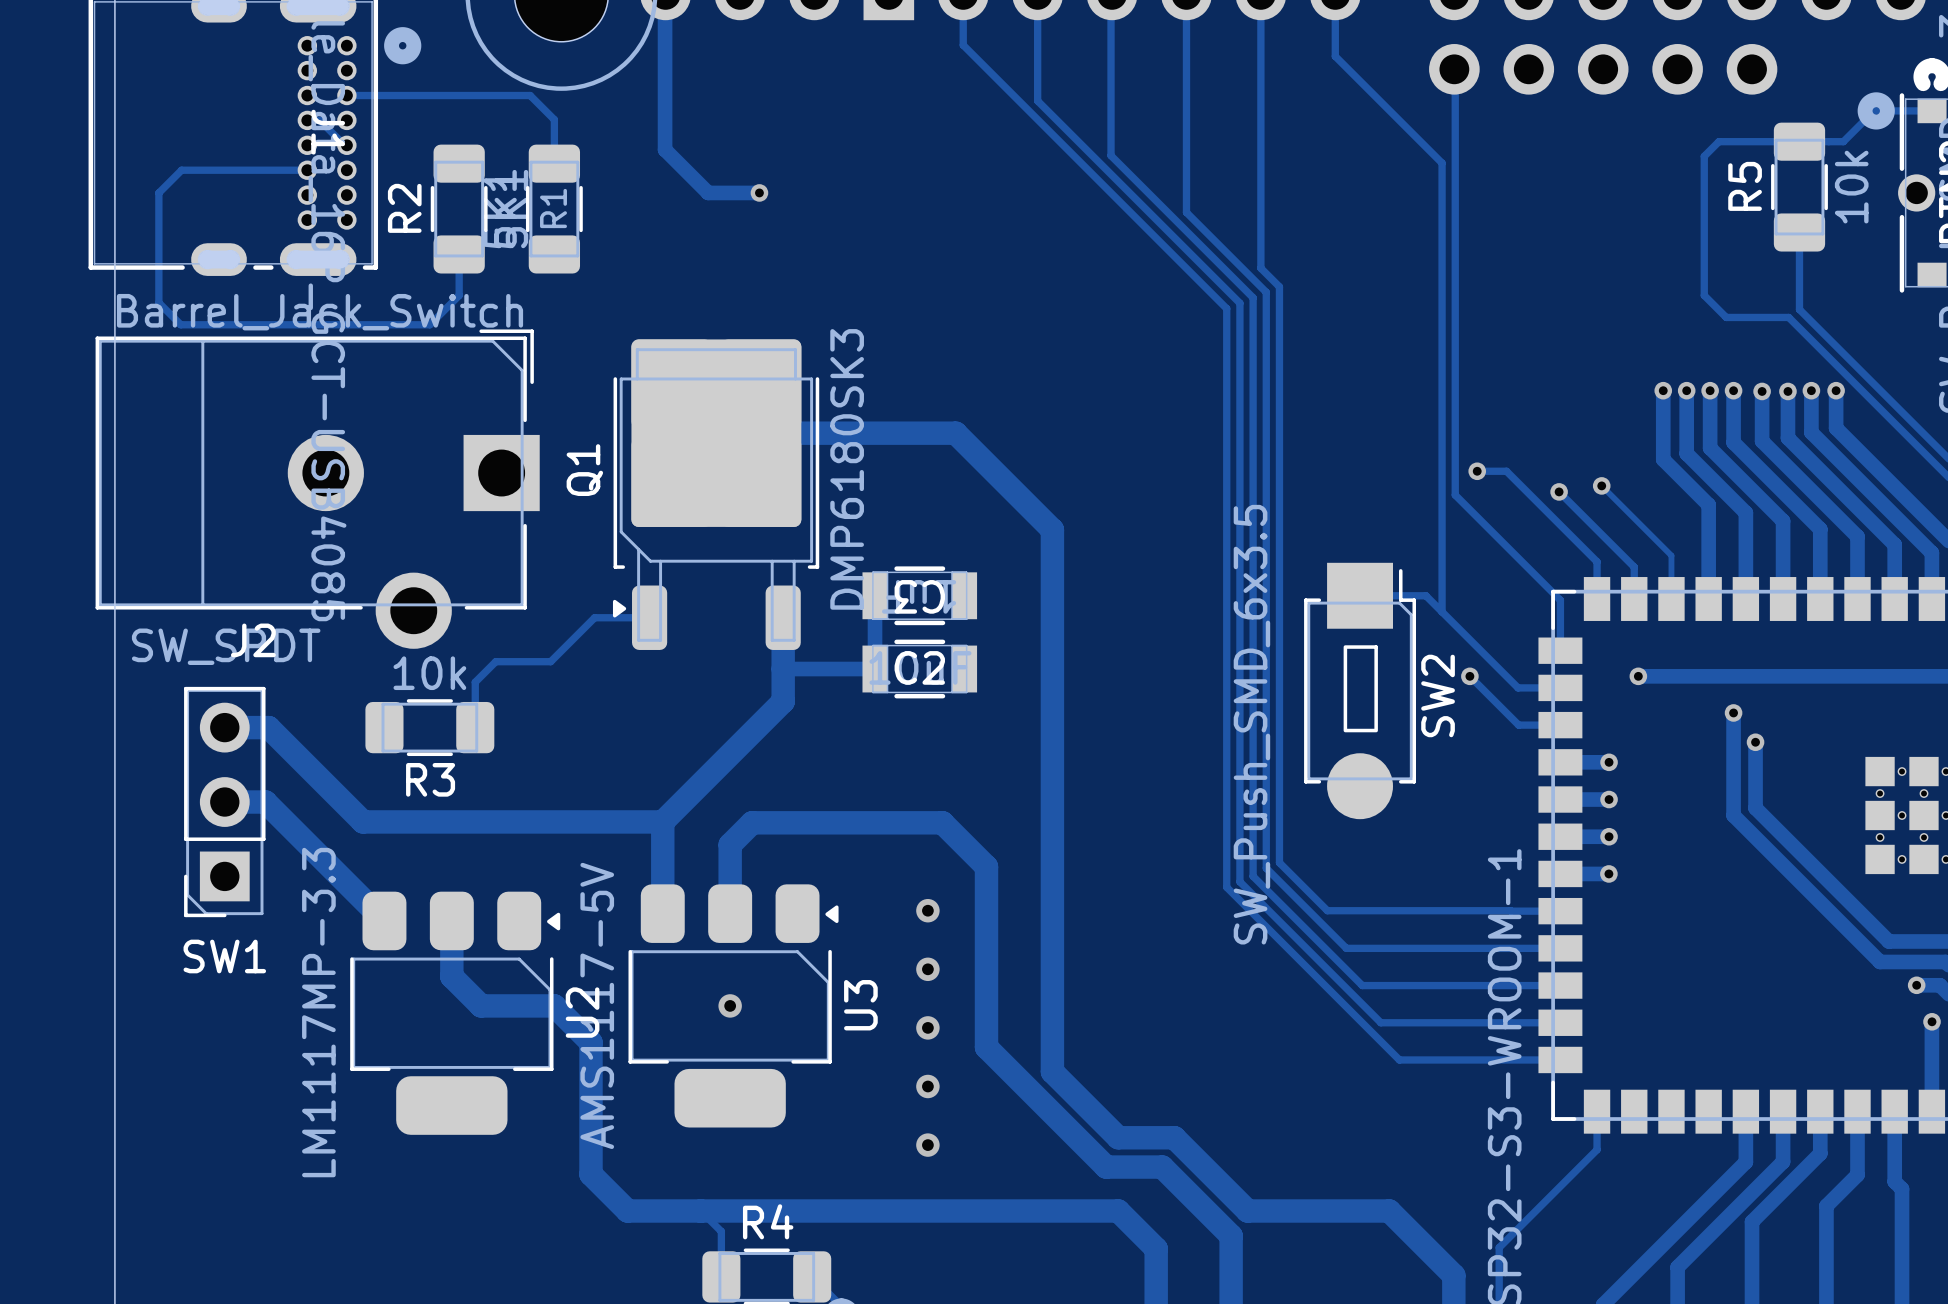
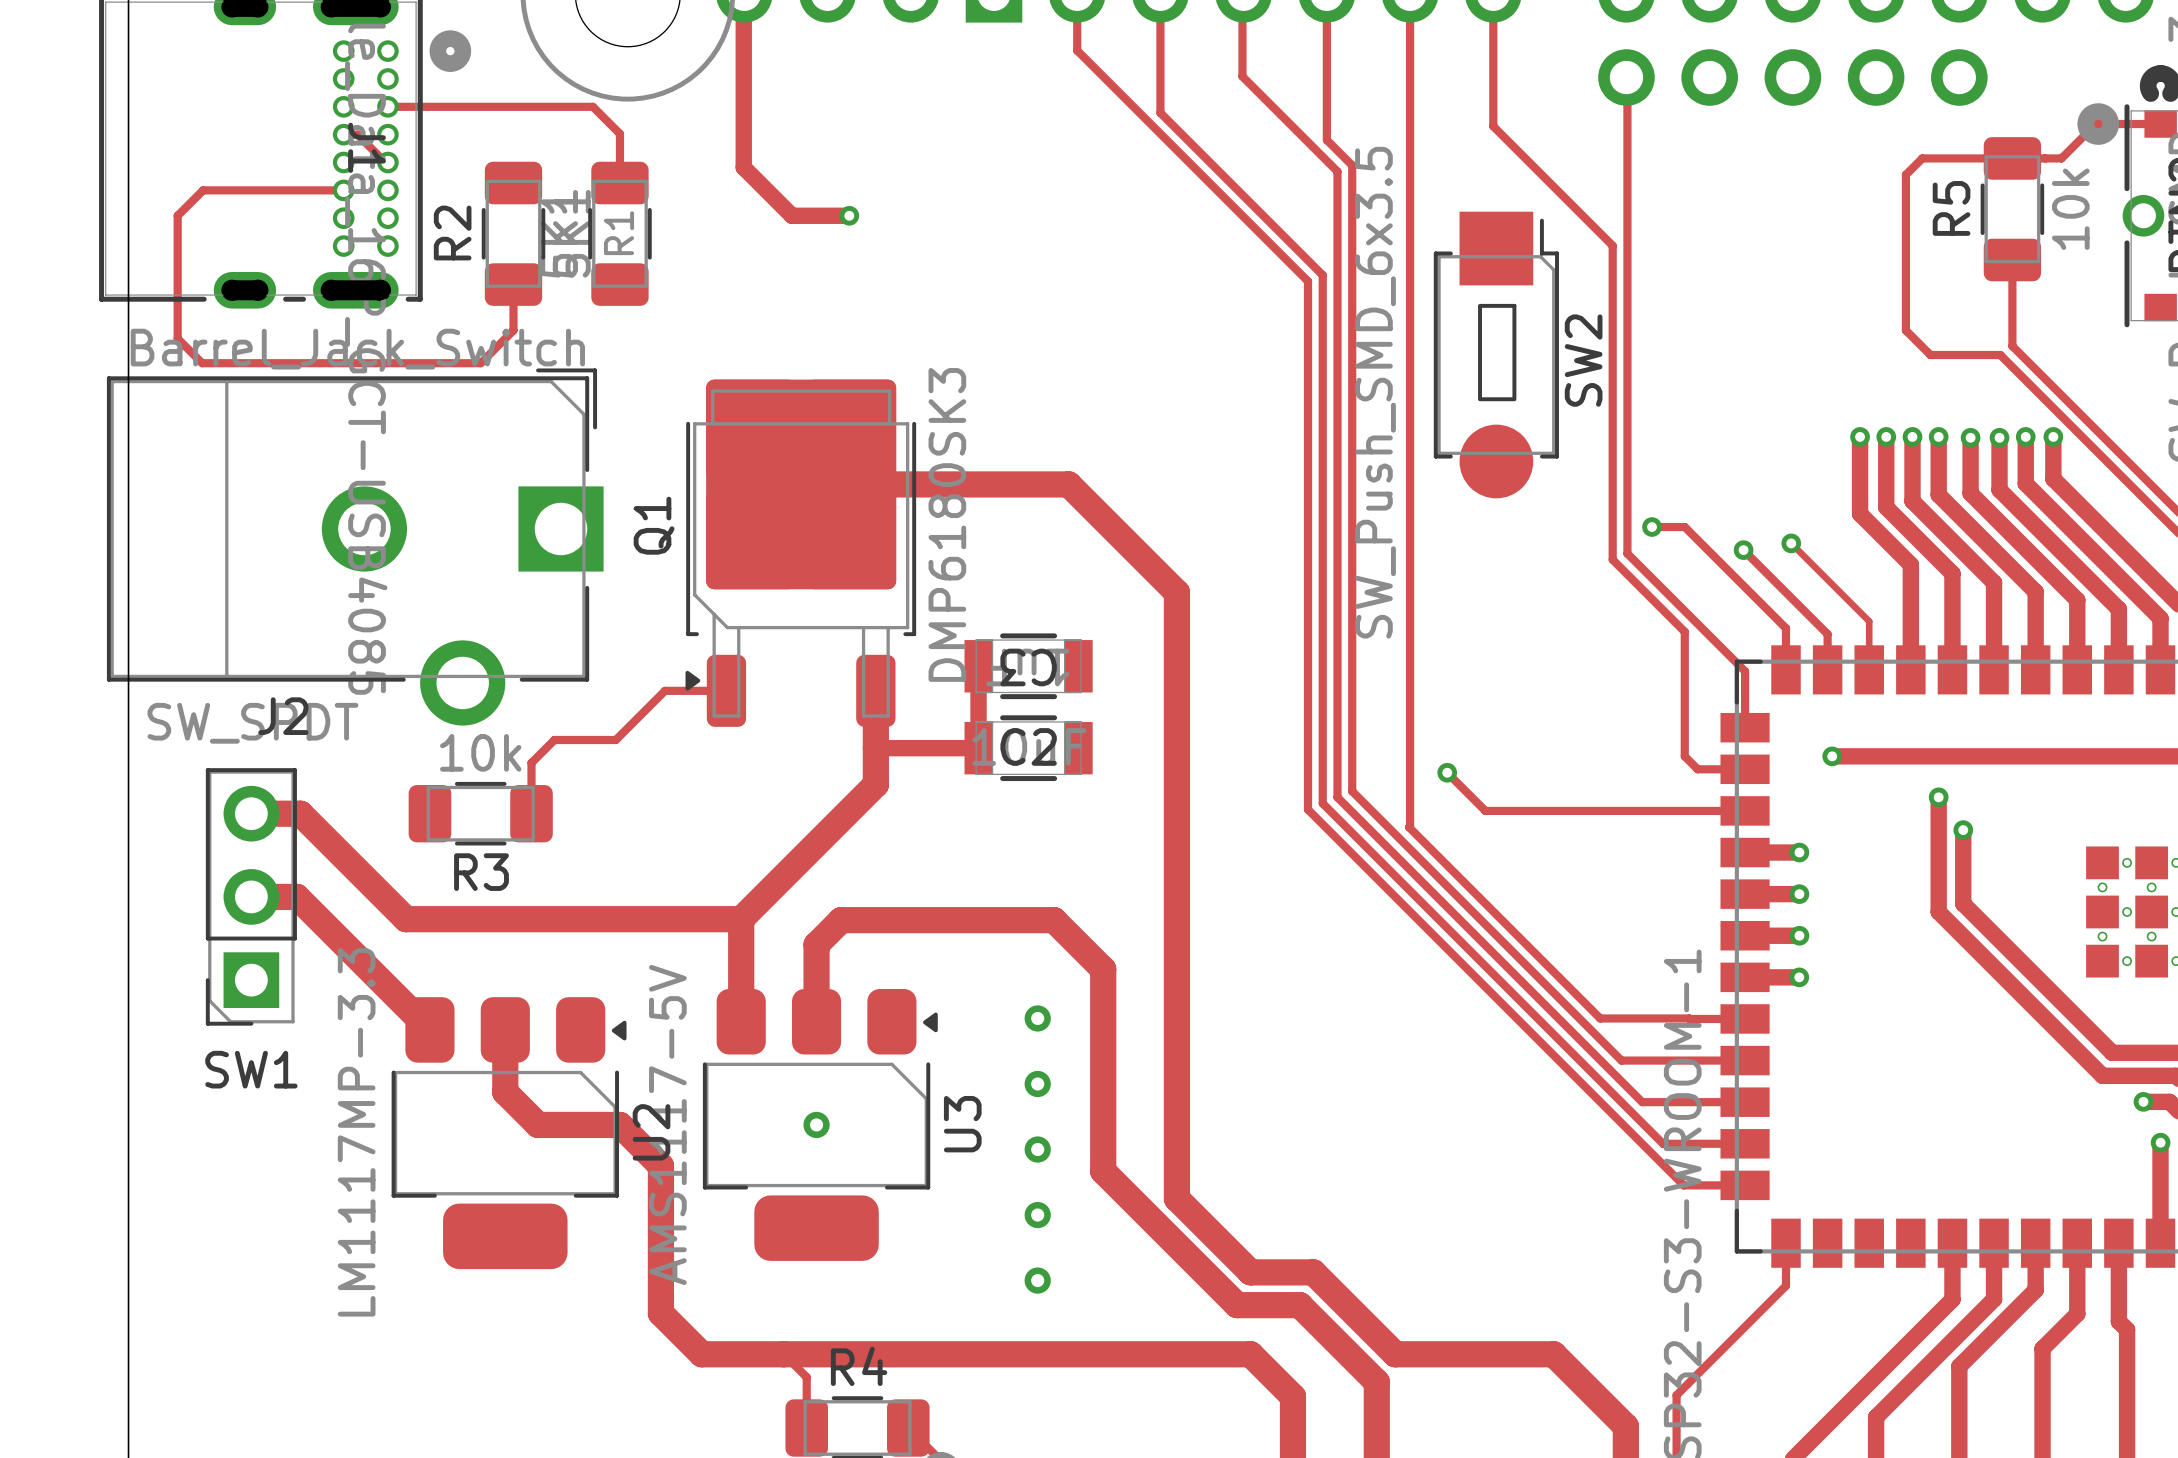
track: (1335, 56) (1442, 163) (1442, 219) -> (1493, 63) (1493, 126) (1612, 245)
track: (1111, 68) (1111, 155) (1253, 297) (1253, 876) (1362, 985) (1468, 985) -> (1242, 76) (1337, 171) (1337, 797) (1642, 1102)
track: (1186, 125) (1186, 212) (1266, 292) (1266, 868) (1346, 948) (1449, 948) -> (1326, 140) (1352, 165) (1352, 791) (1621, 1060)
track: (1182, 246) (1239, 303) (1239, 881) (1380, 1022) (1487, 1022) -> (1322, 275) (1322, 803) (1663, 1143)
track: (1169, 251) (1226, 308) (1226, 887) (1399, 1059) (1505, 1059) -> (1308, 281) (1308, 809) (1683, 1185)
track: (1260, 268) (1279, 286) (1279, 862) (1327, 910) (1430, 910) -> (1410, 299) (1409, 827) (1600, 1018)
track: (1442, 500) (1442, 611) -> (1612, 559) (1684, 631) (1684, 756)
track: (1360, 595) (1425, 595) (1506, 676) -> none
track: (1469, 676) (1518, 725) -> (1447, 772) (1485, 810) (1698, 810)
via: (1469, 676) -> none
via: none -> (1447, 772)
SW2 position: (1360, 690) -> (1496, 355)

